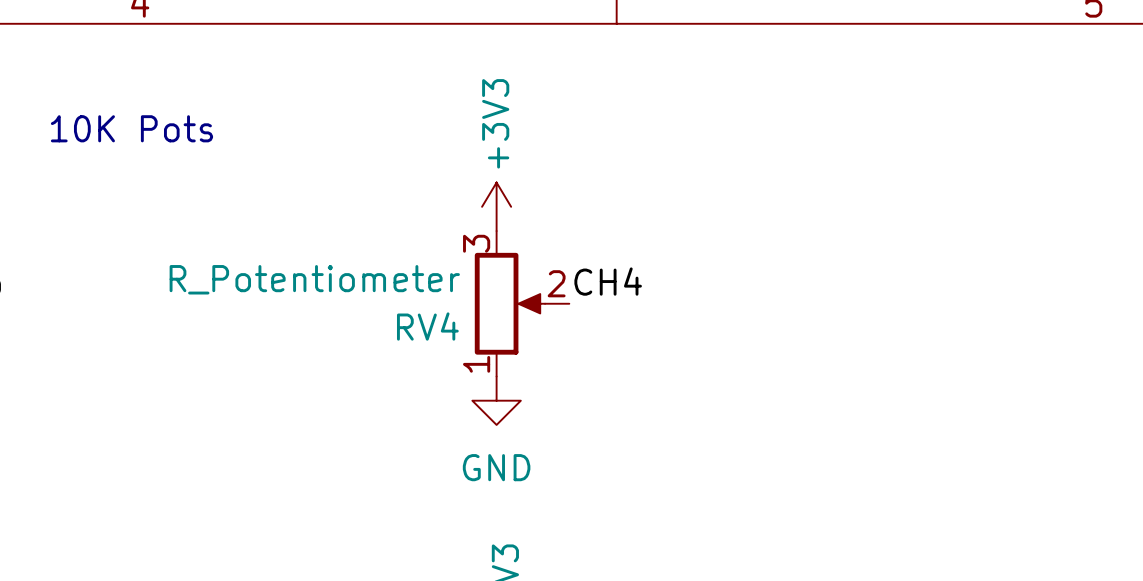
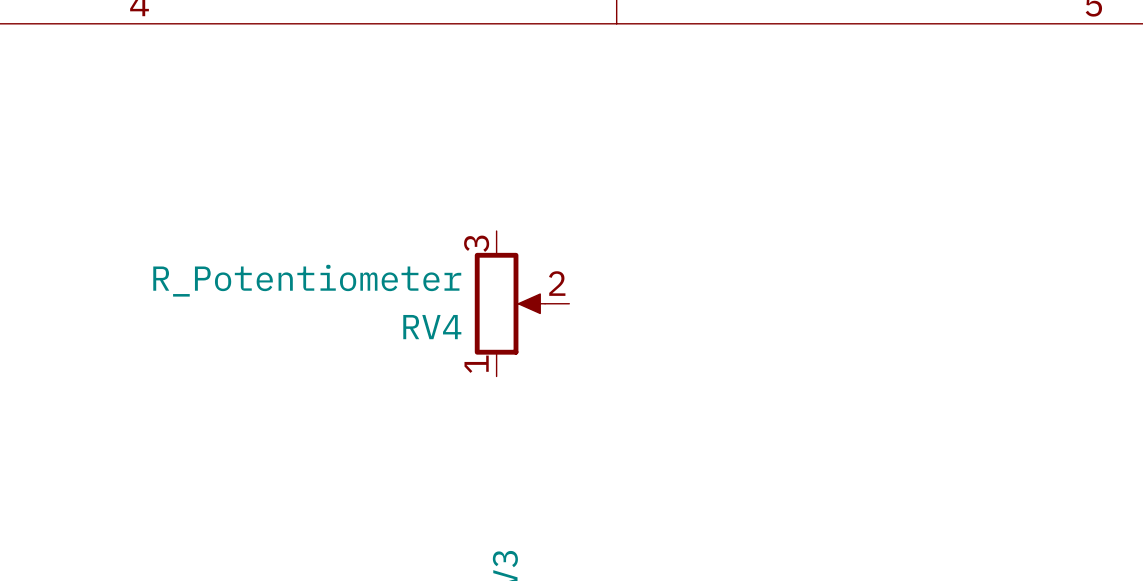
text: 10K Pots (131, 128) -> none
power symbol: +3V3 (496, 206) -> none
label: CH4 (608, 281) -> none
power symbol: GND (496, 400) -> none

